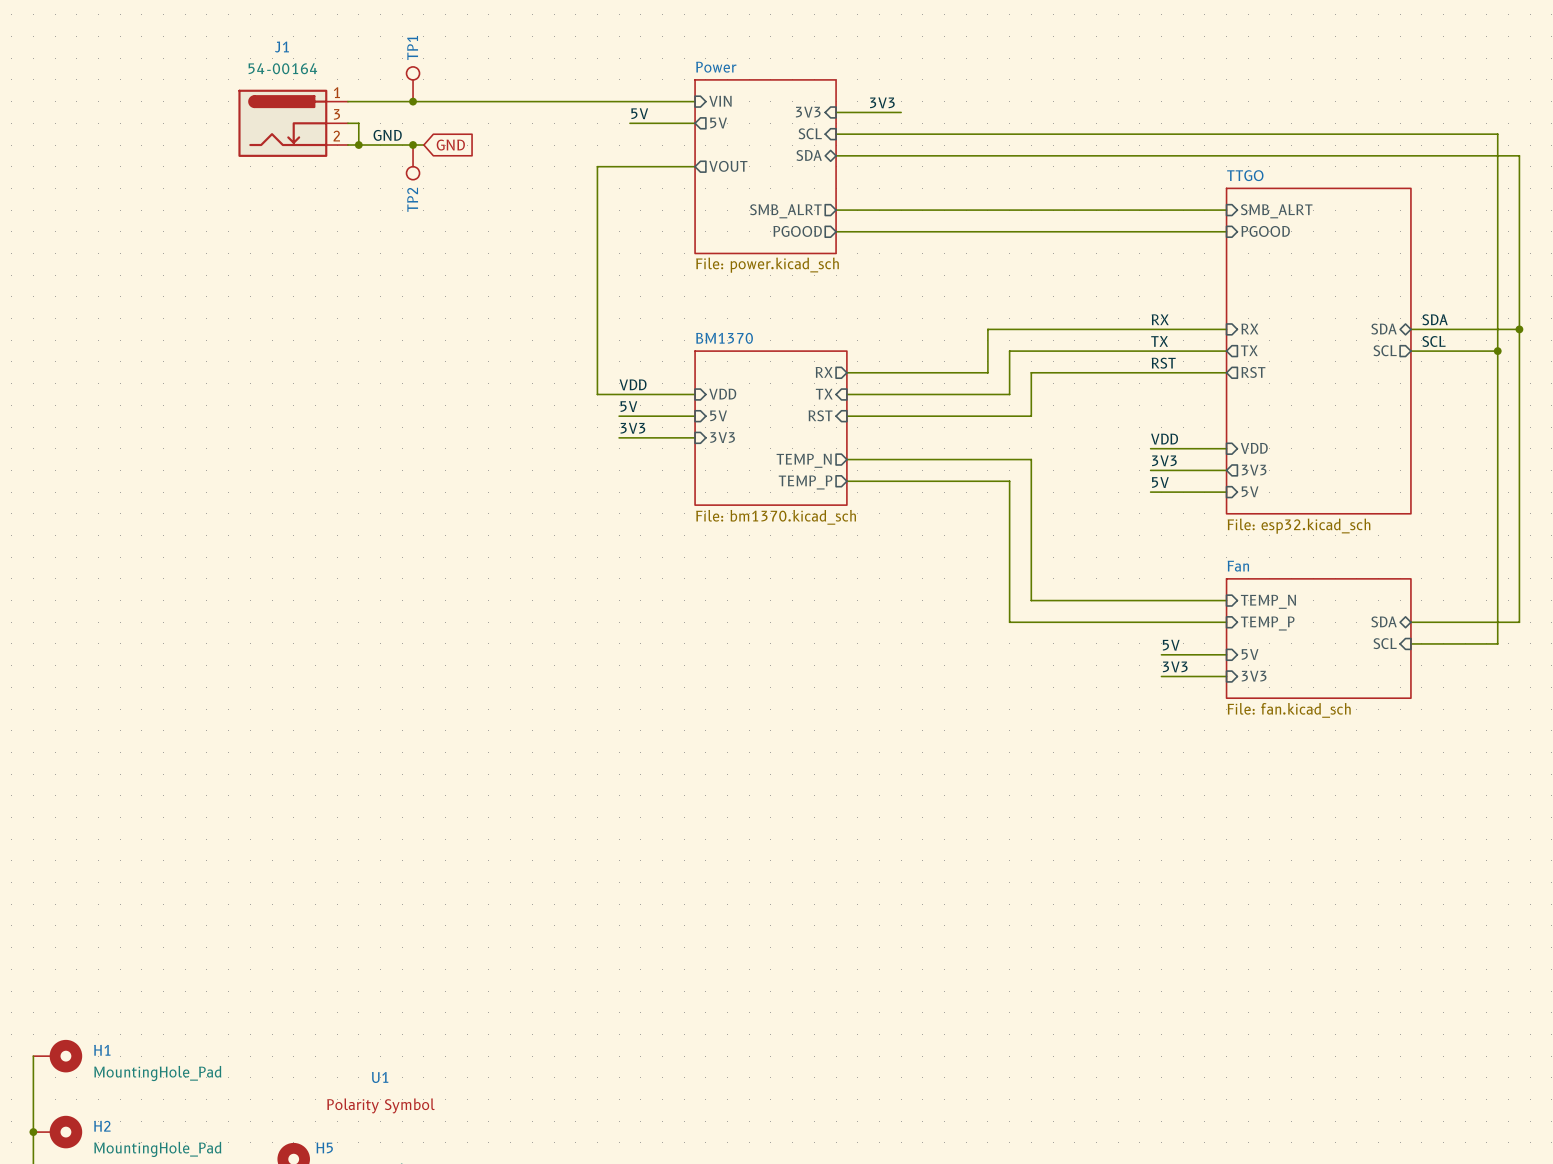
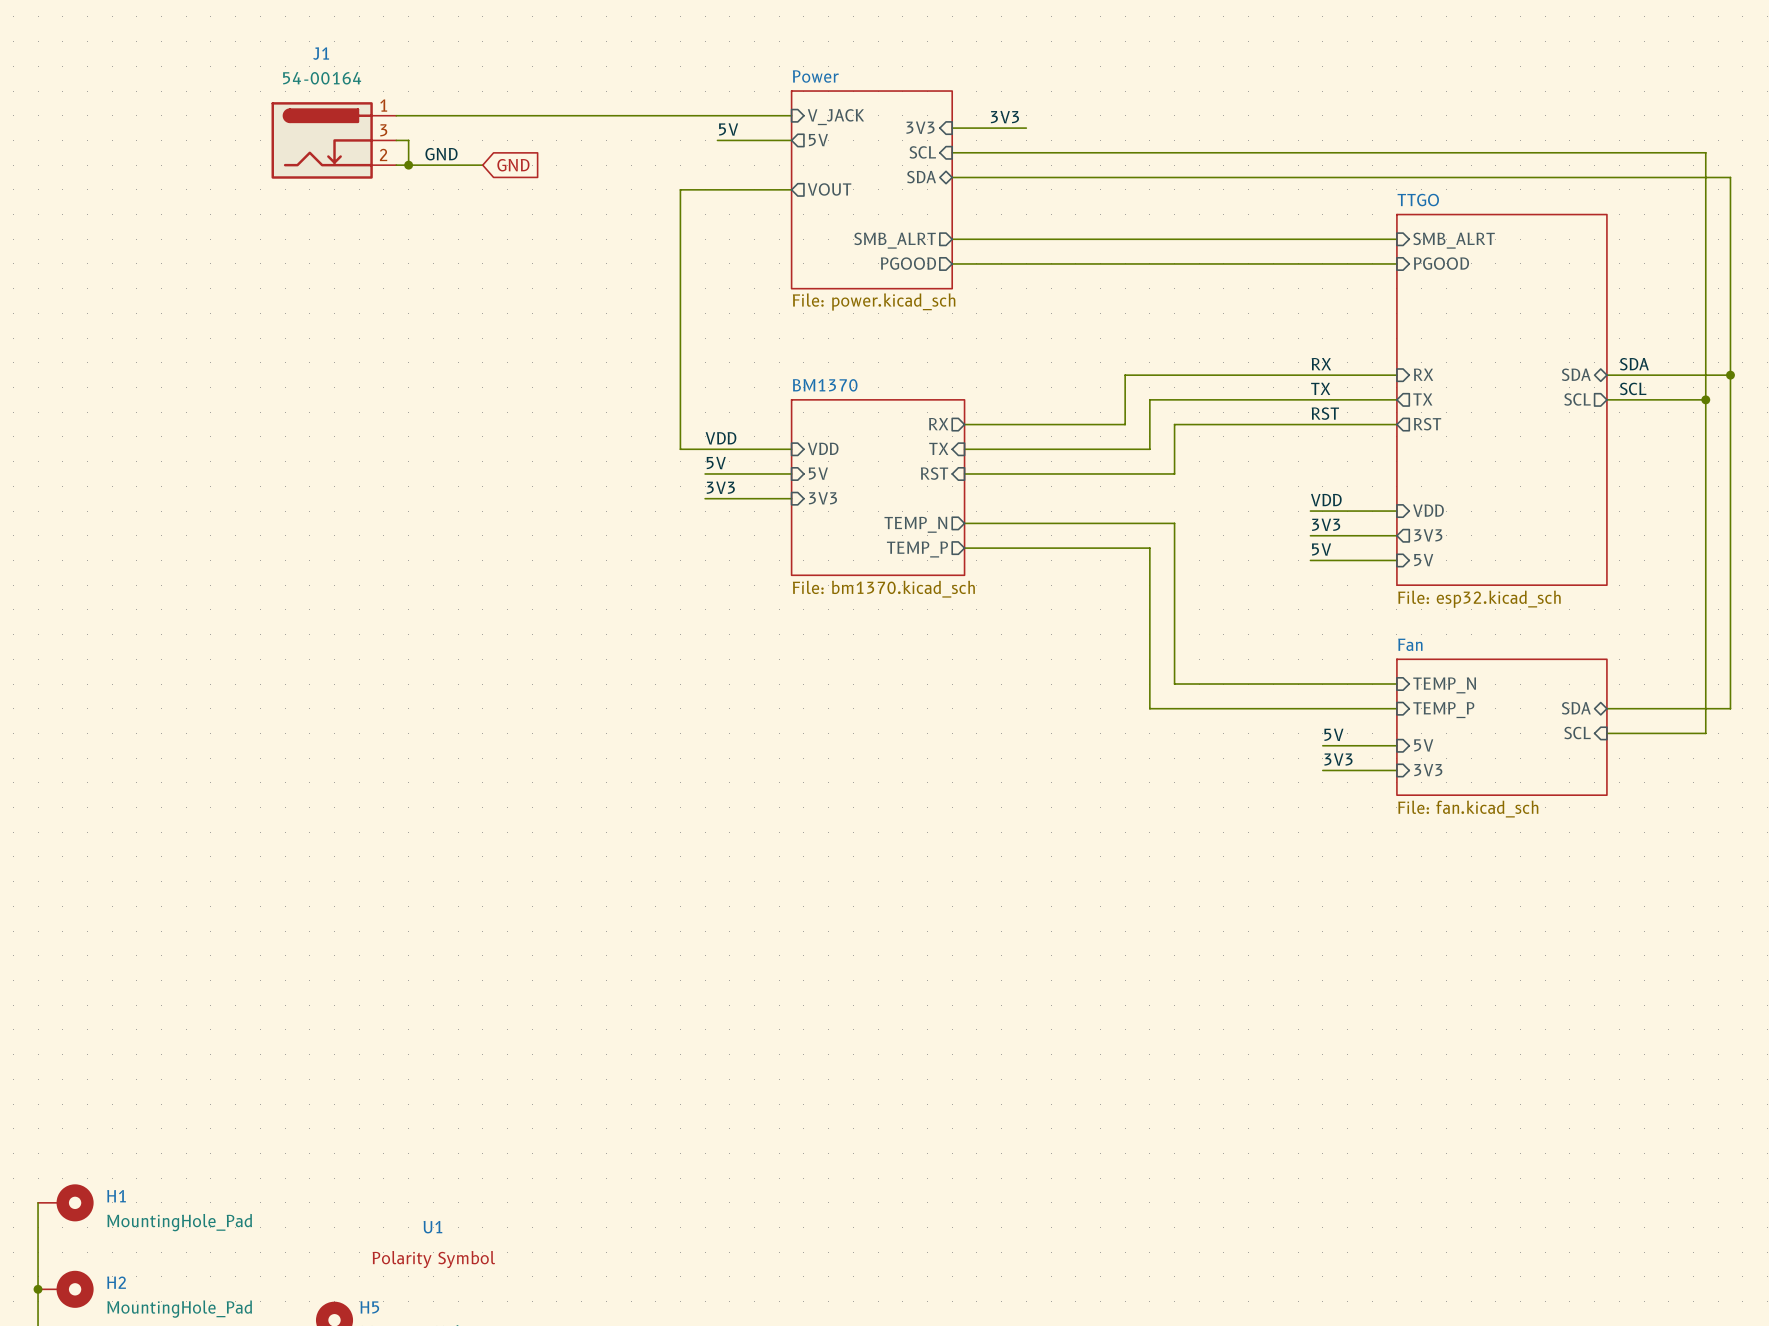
TP1: (413, 84) -> none
junction: (413, 101) -> none
sheet pin: VIN (720, 101) -> V_JACK (835, 117)
junction: (413, 145) -> none
TP2: (413, 162) -> none

